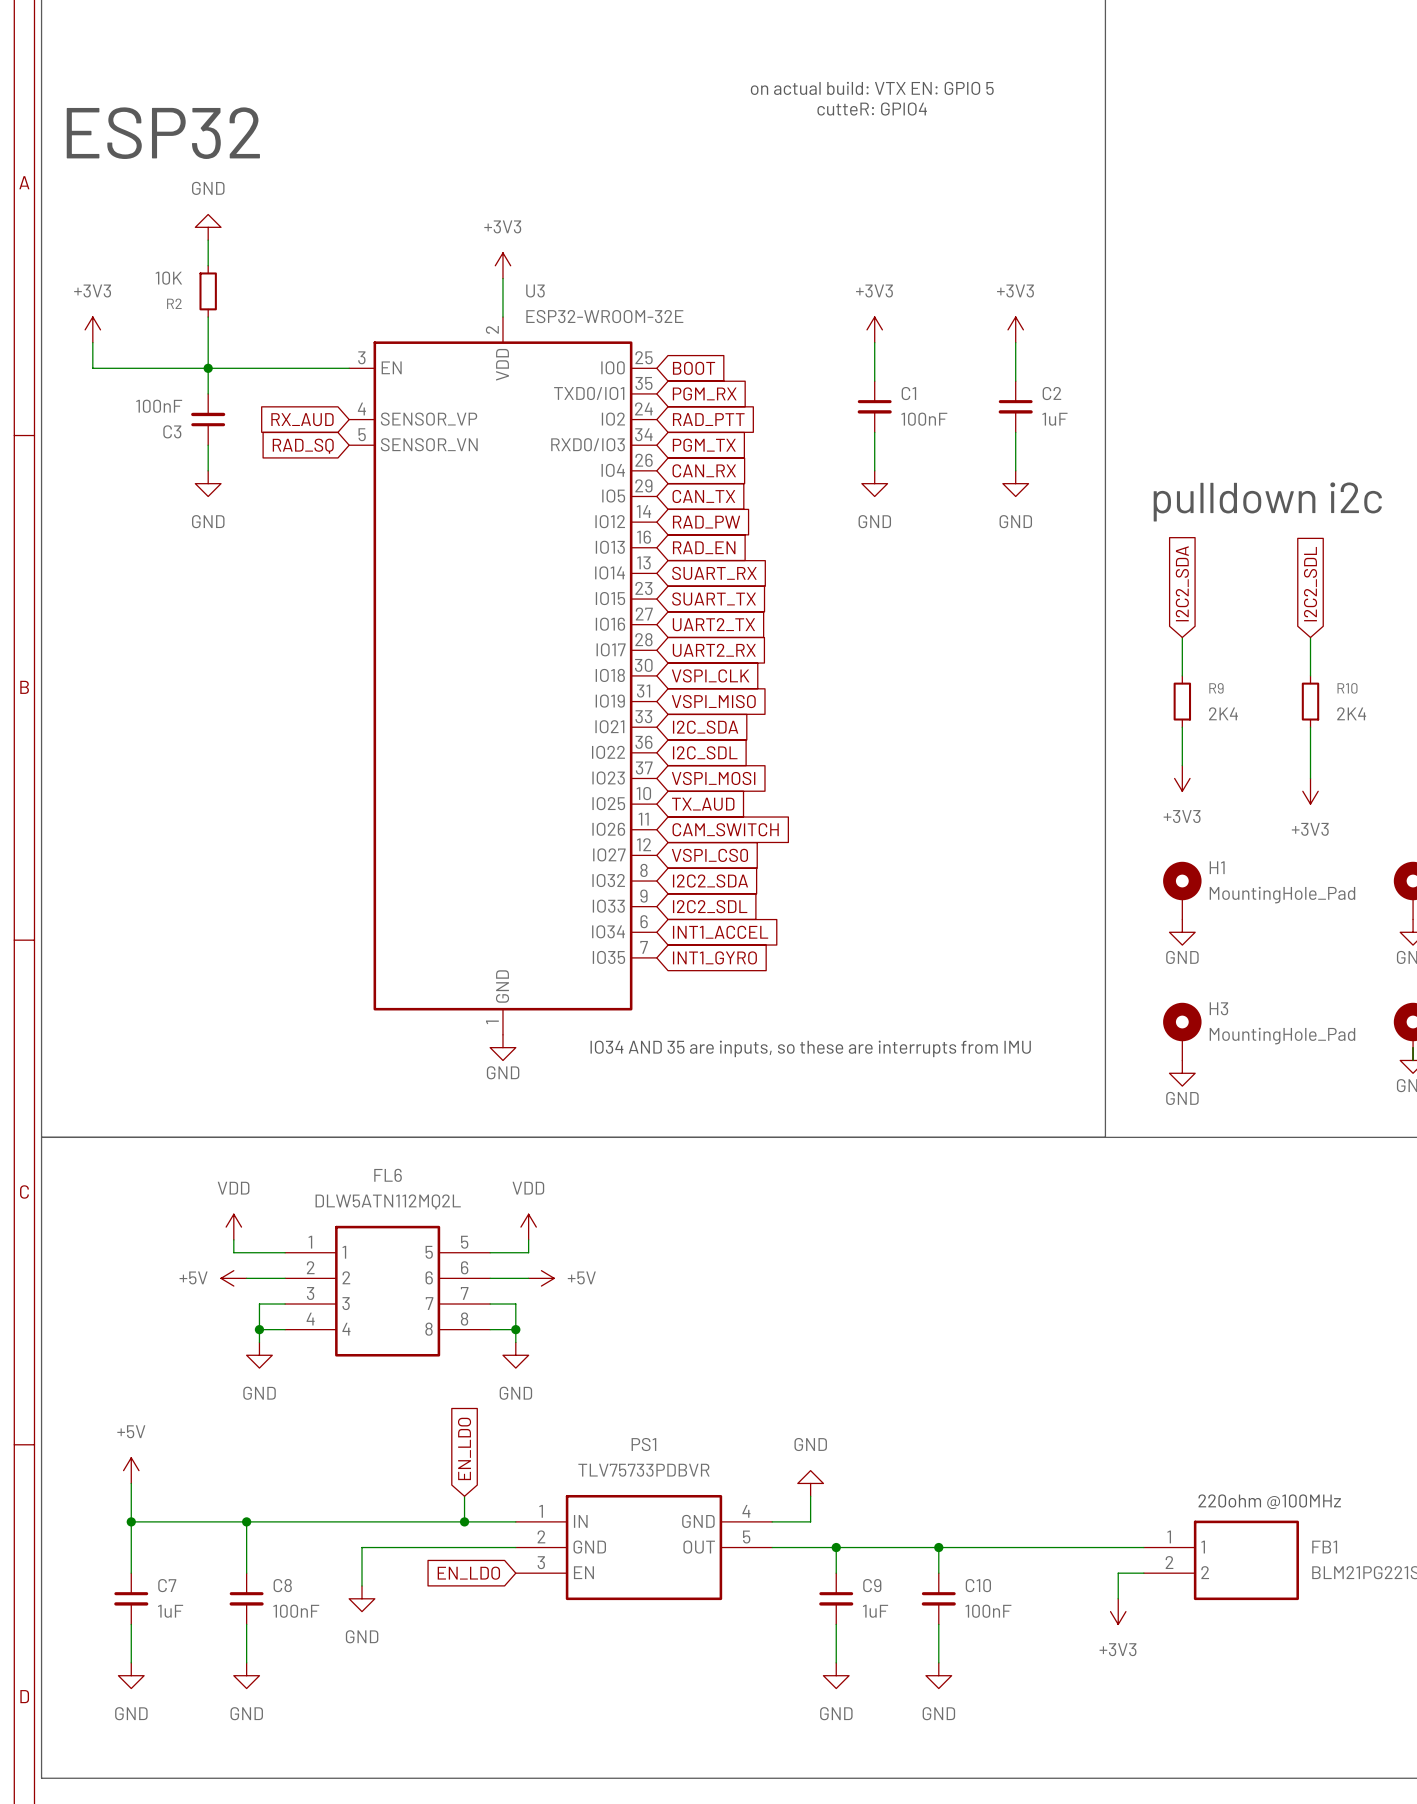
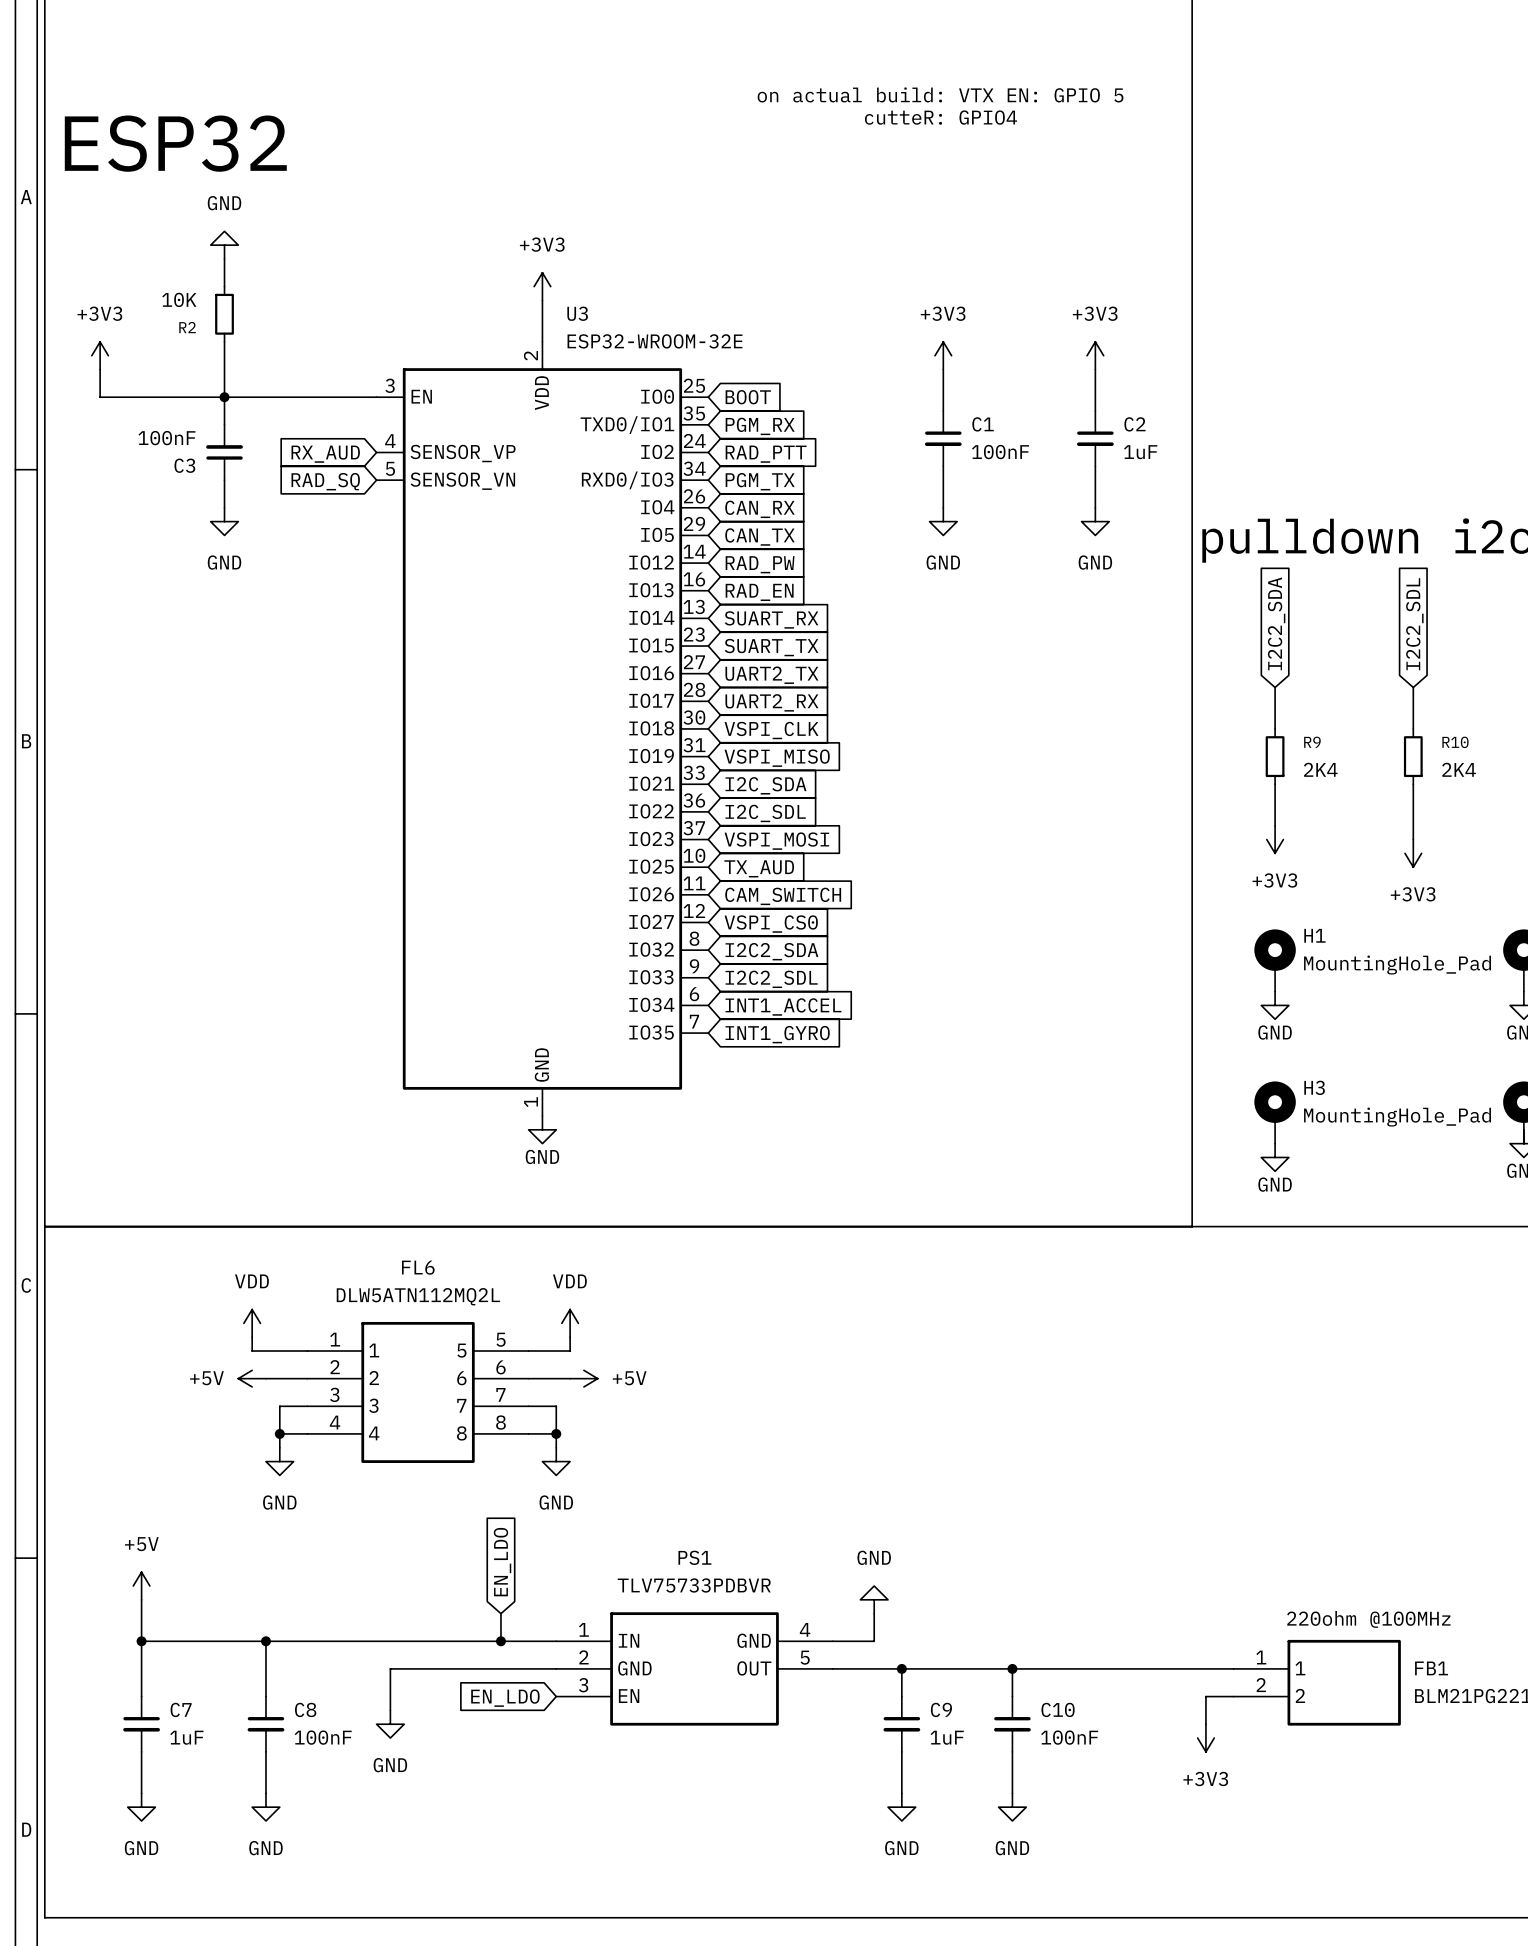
text: IO34 AND 35 are inputs, so these are interrupts from IMU (810, 1048) -> none

